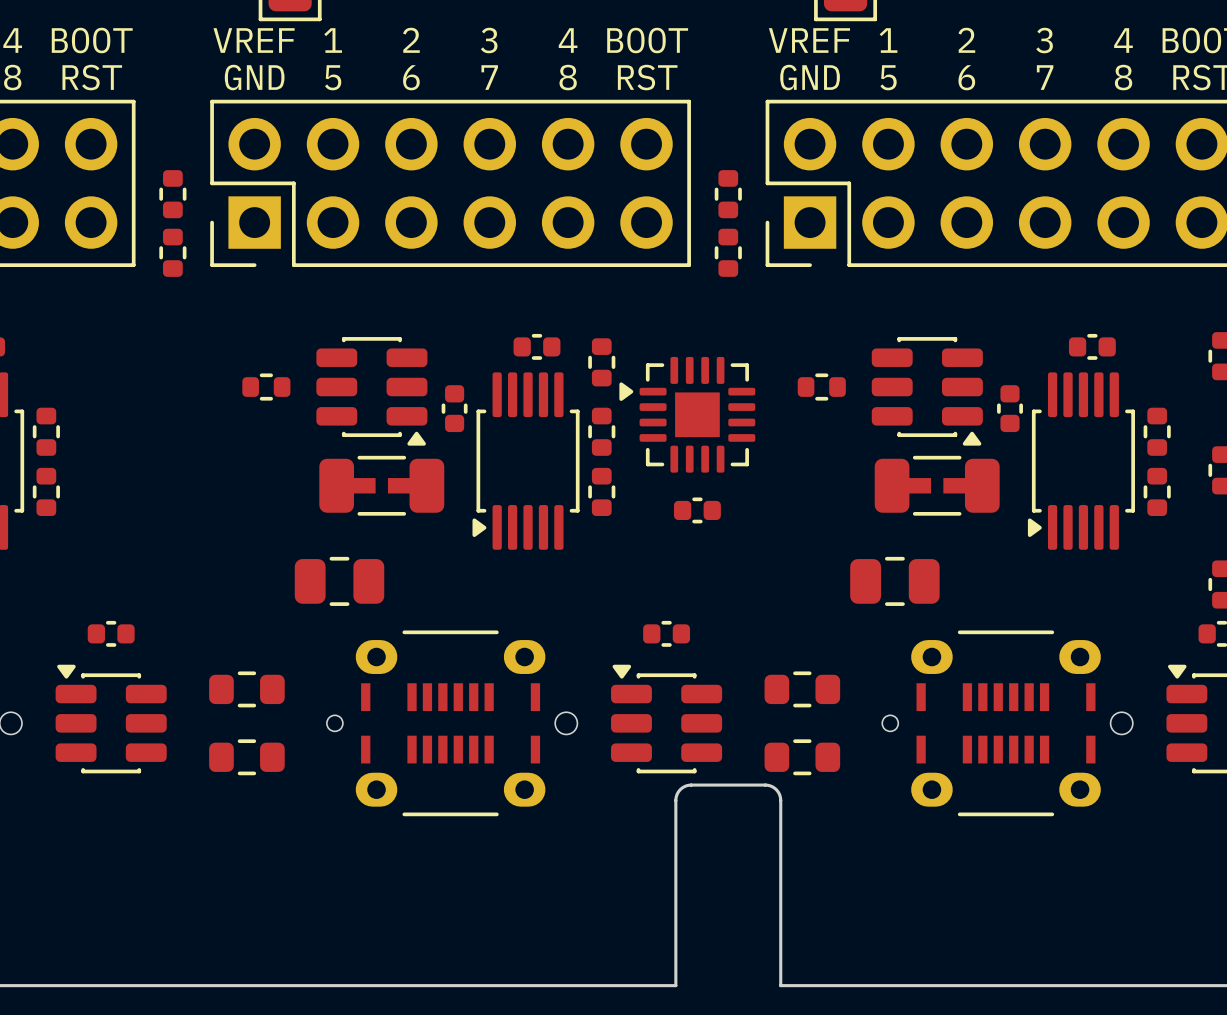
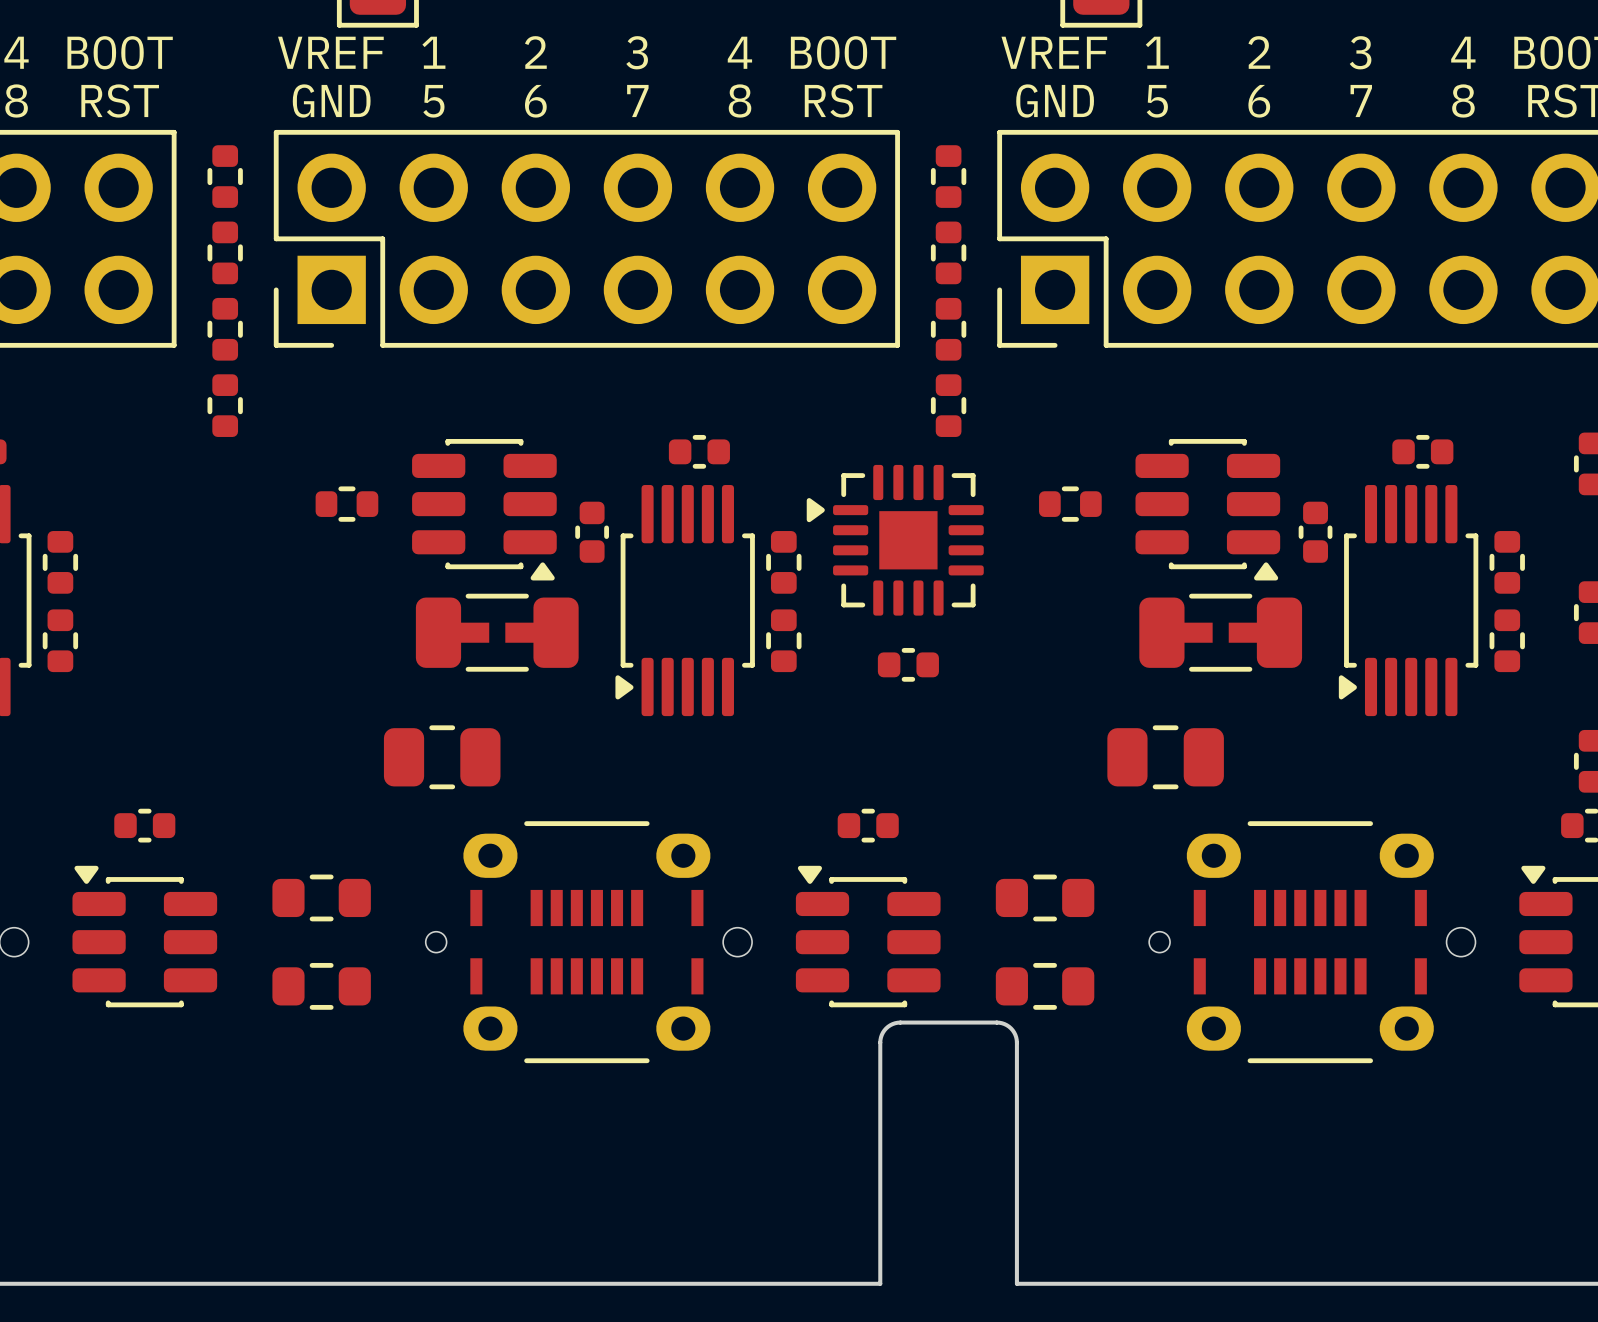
part: none -> (225, 176)
part: none -> (948, 176)
part: none -> (225, 405)
part: none -> (948, 405)
part: (601, 362) -> none

